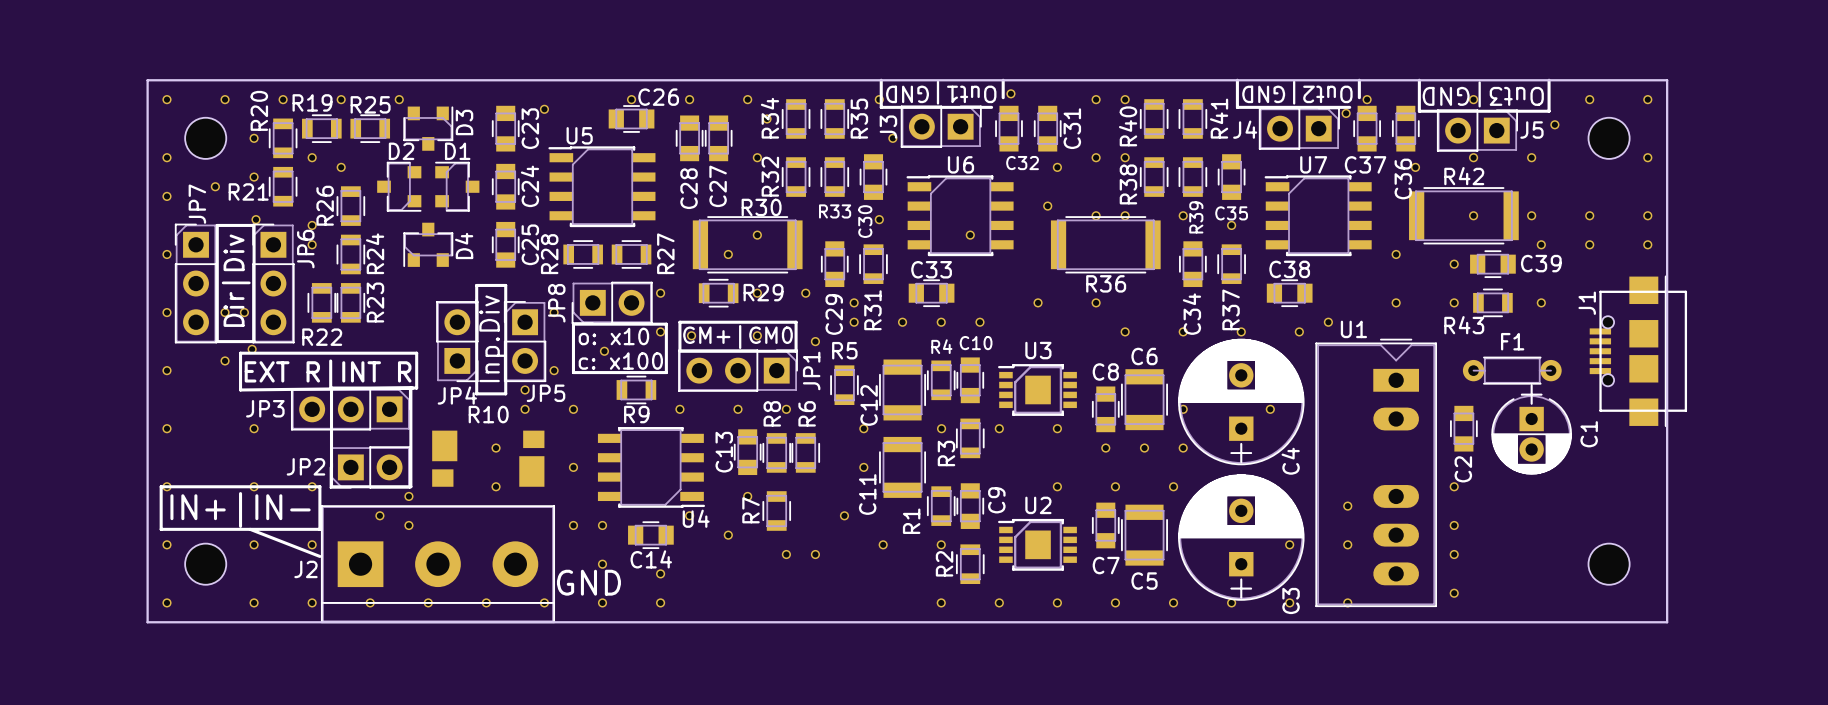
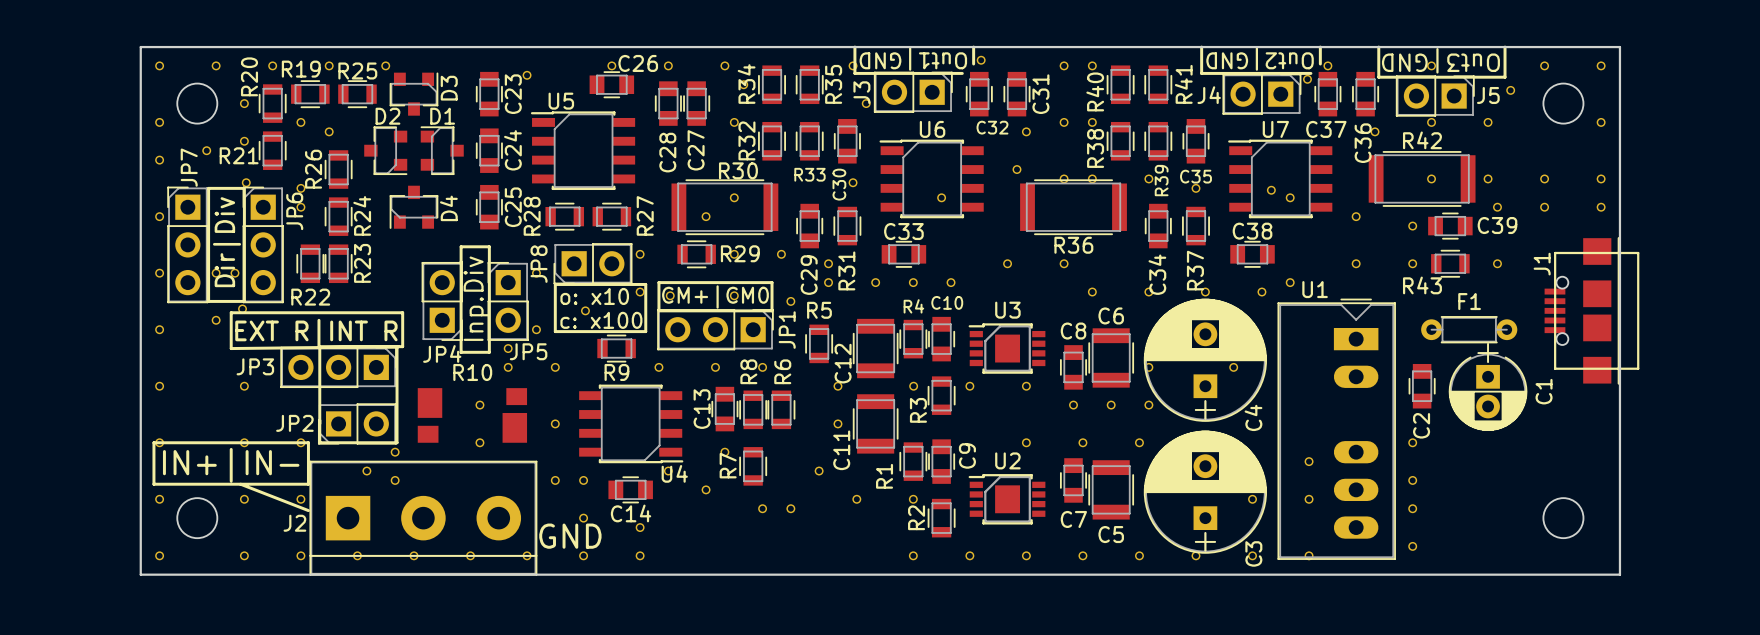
part: none -> (1271, 190)
part: none -> (1290, 197)

